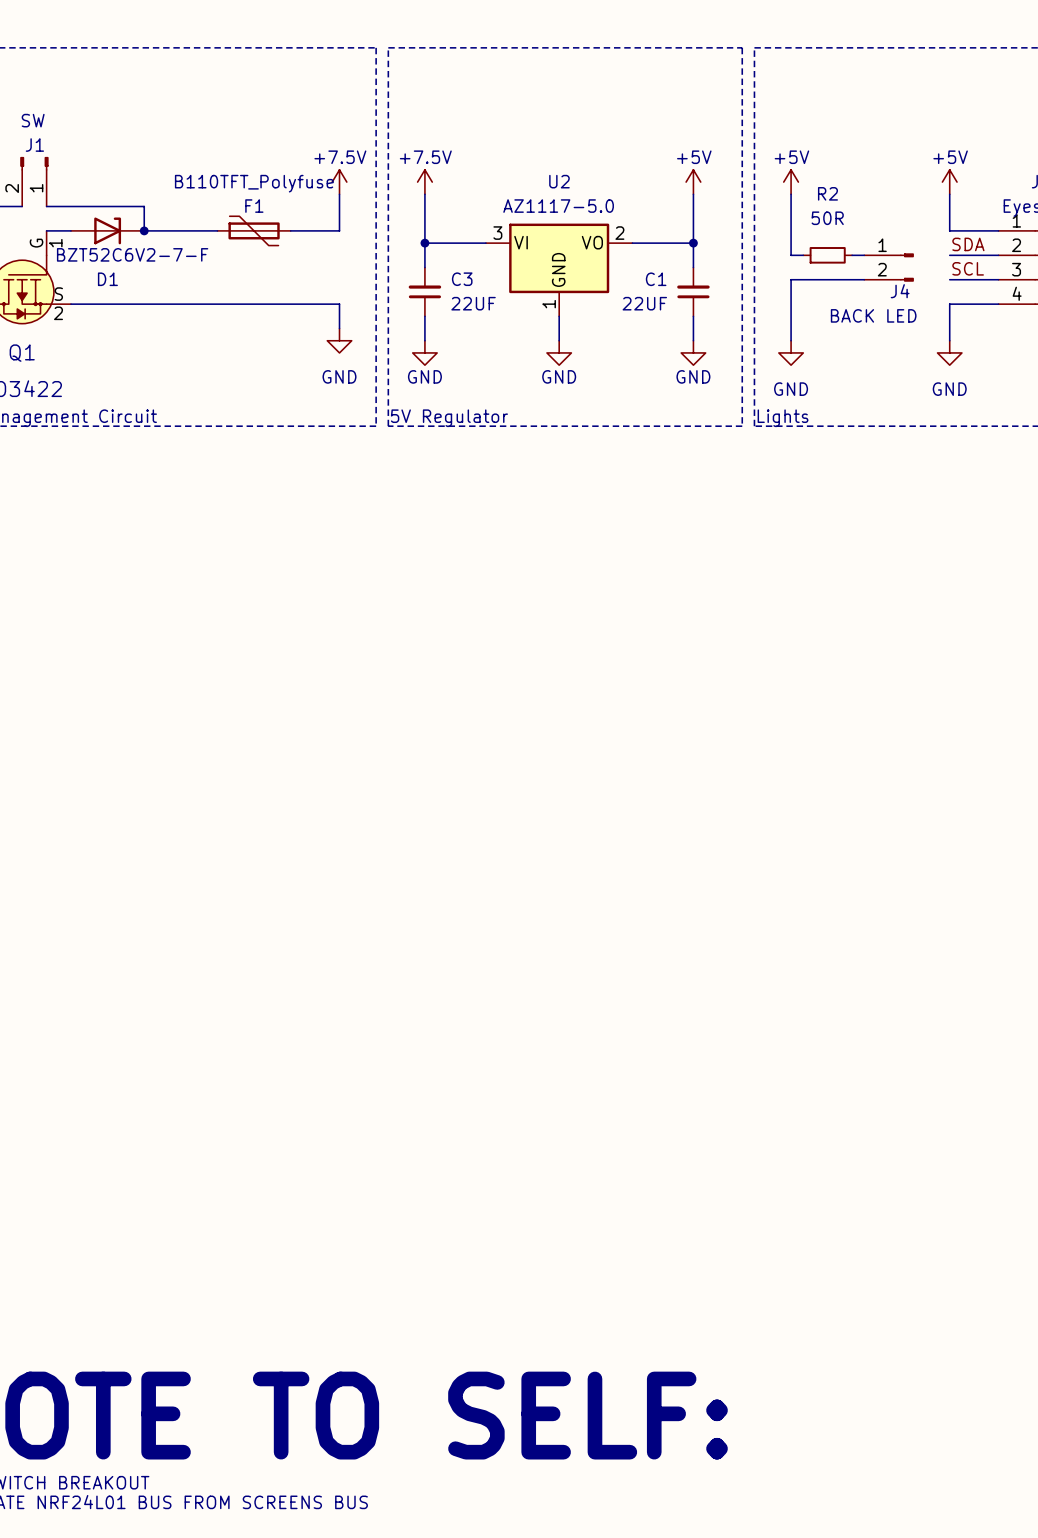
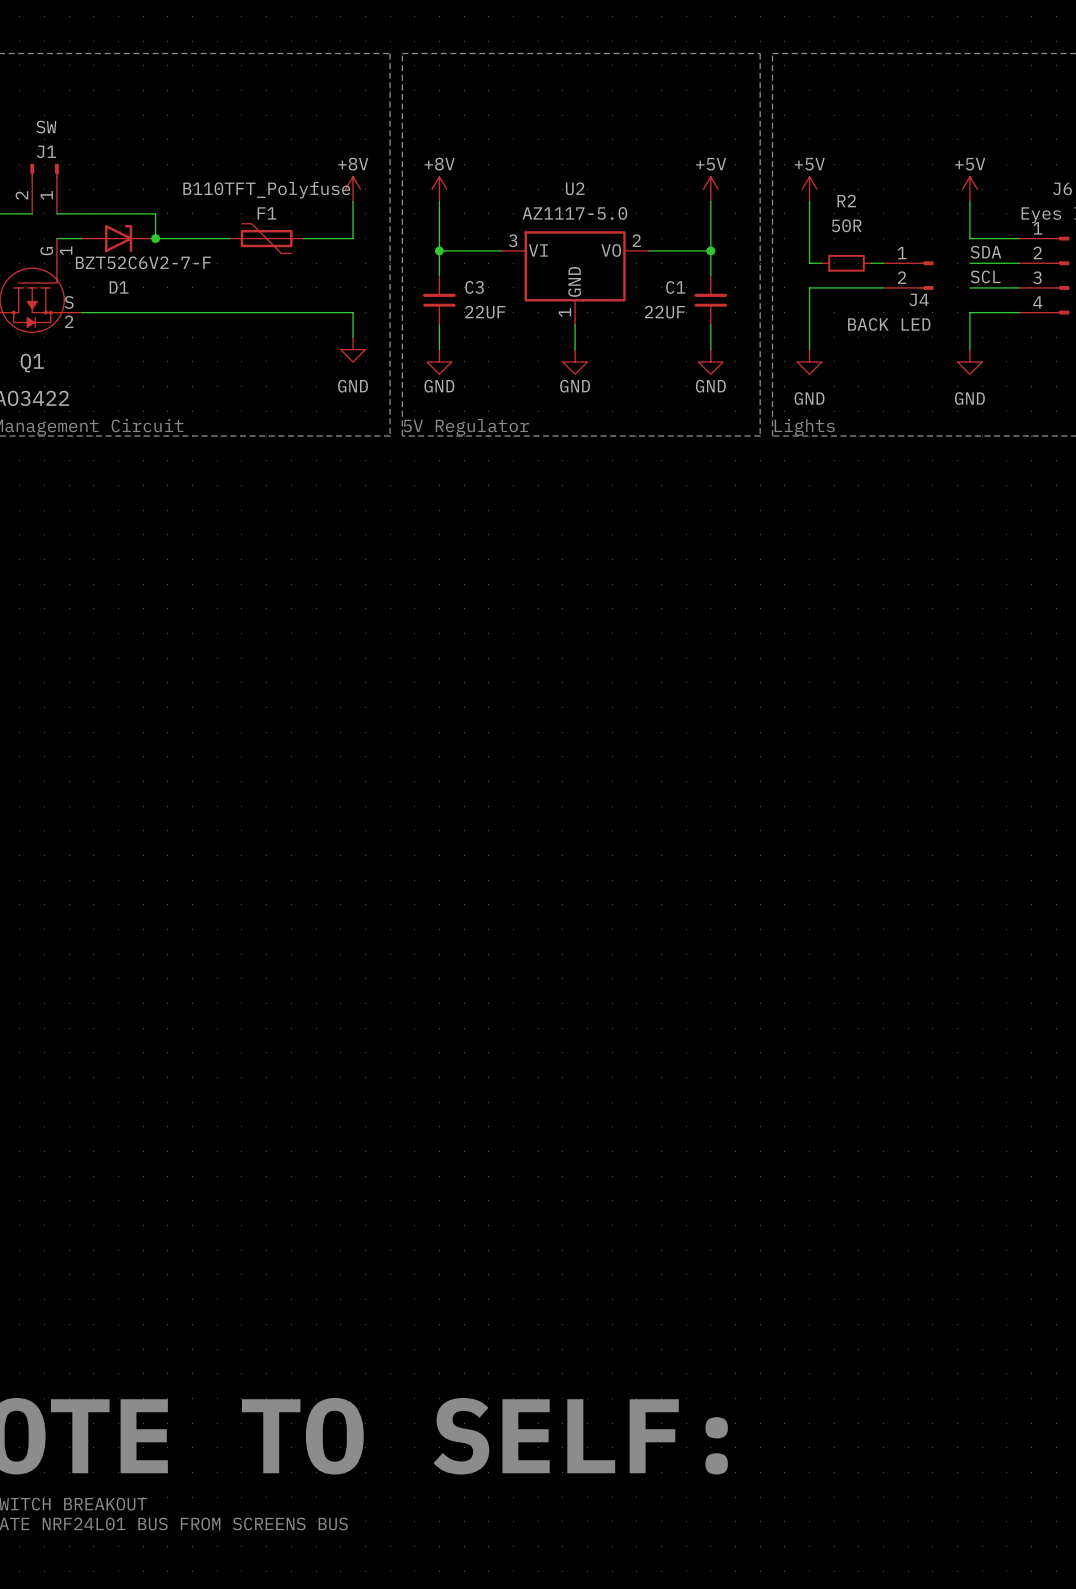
power symbol: +7.5V (339, 182) -> +8V (353, 189)
power symbol: +7.5V (424, 182) -> +8V (439, 189)

